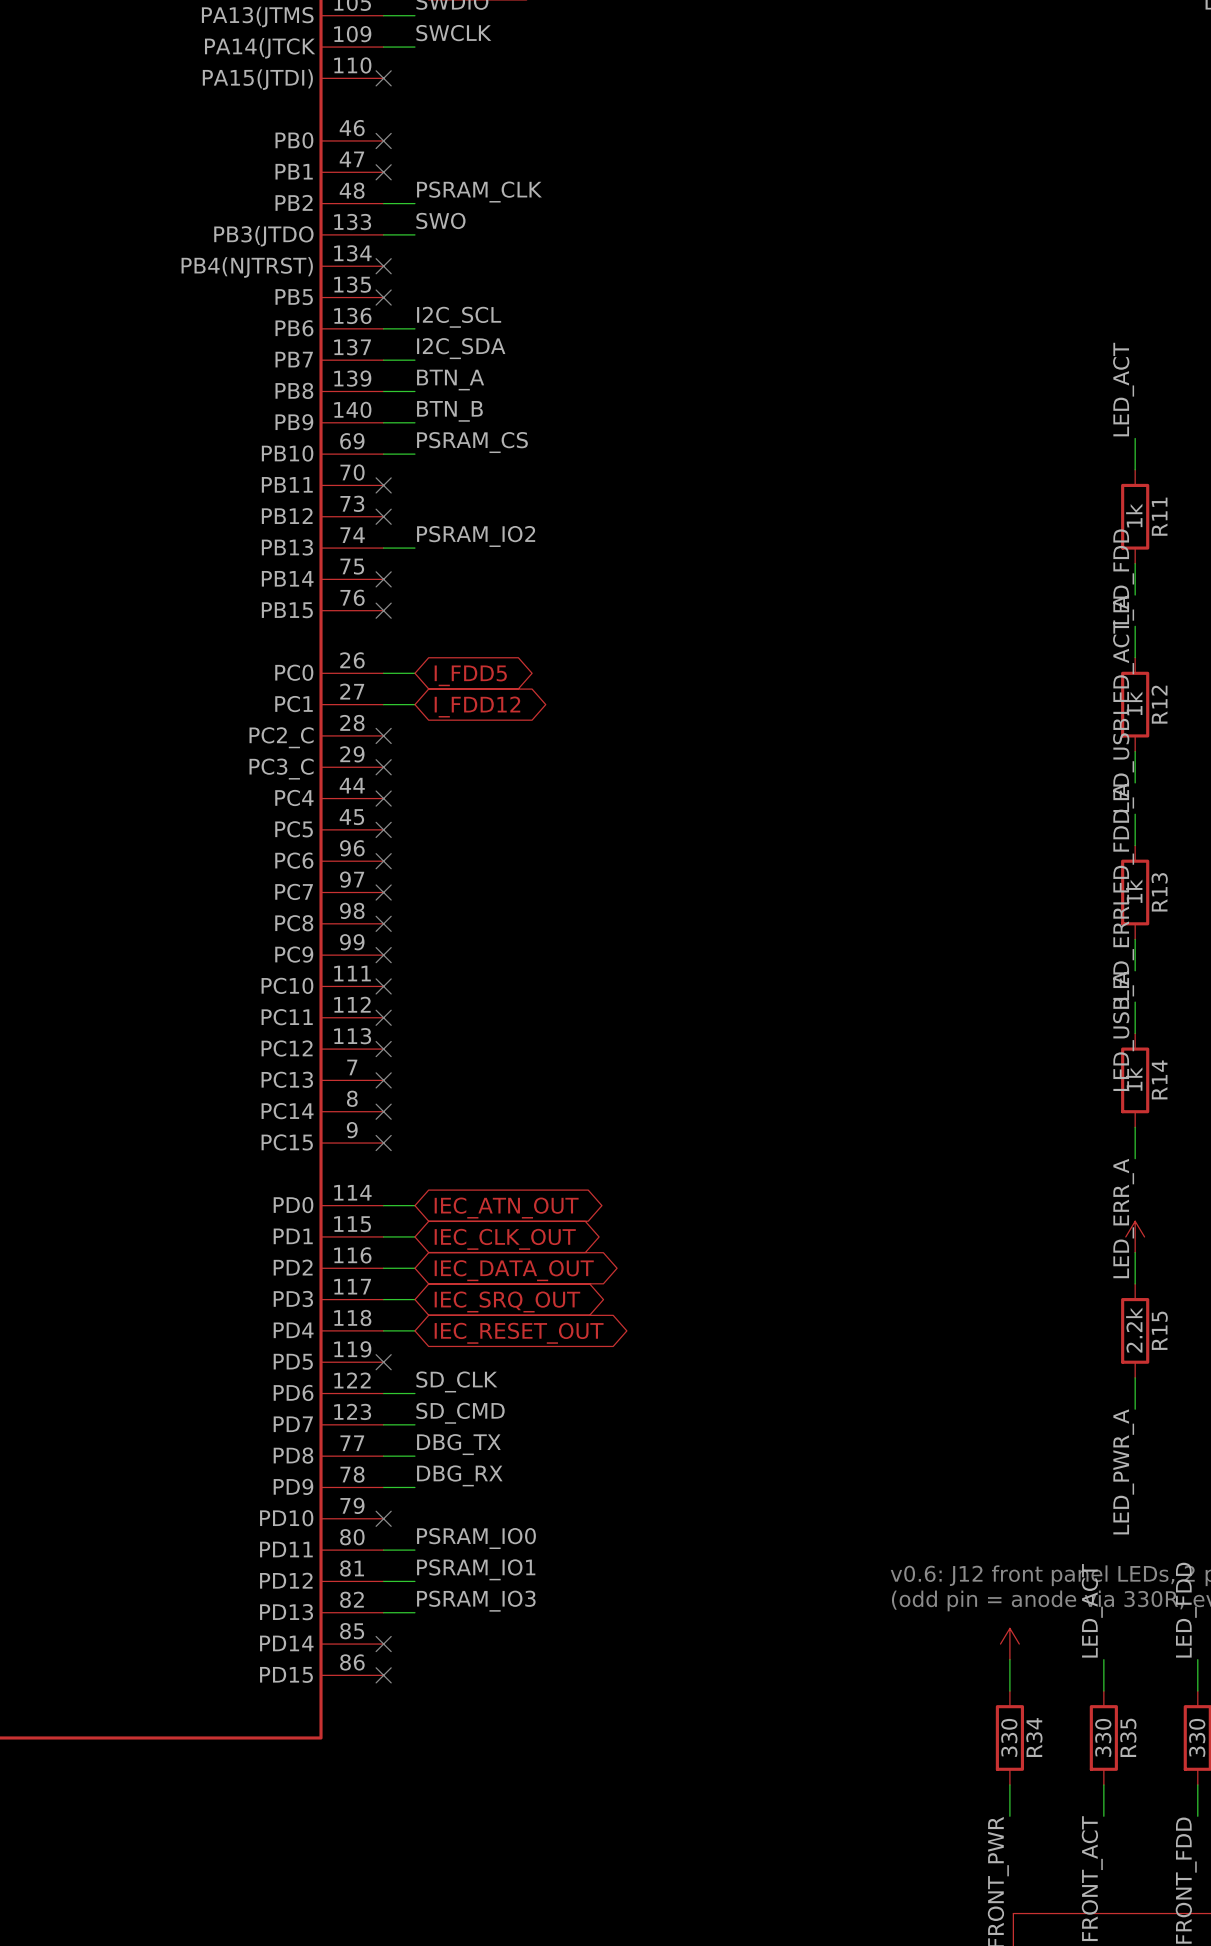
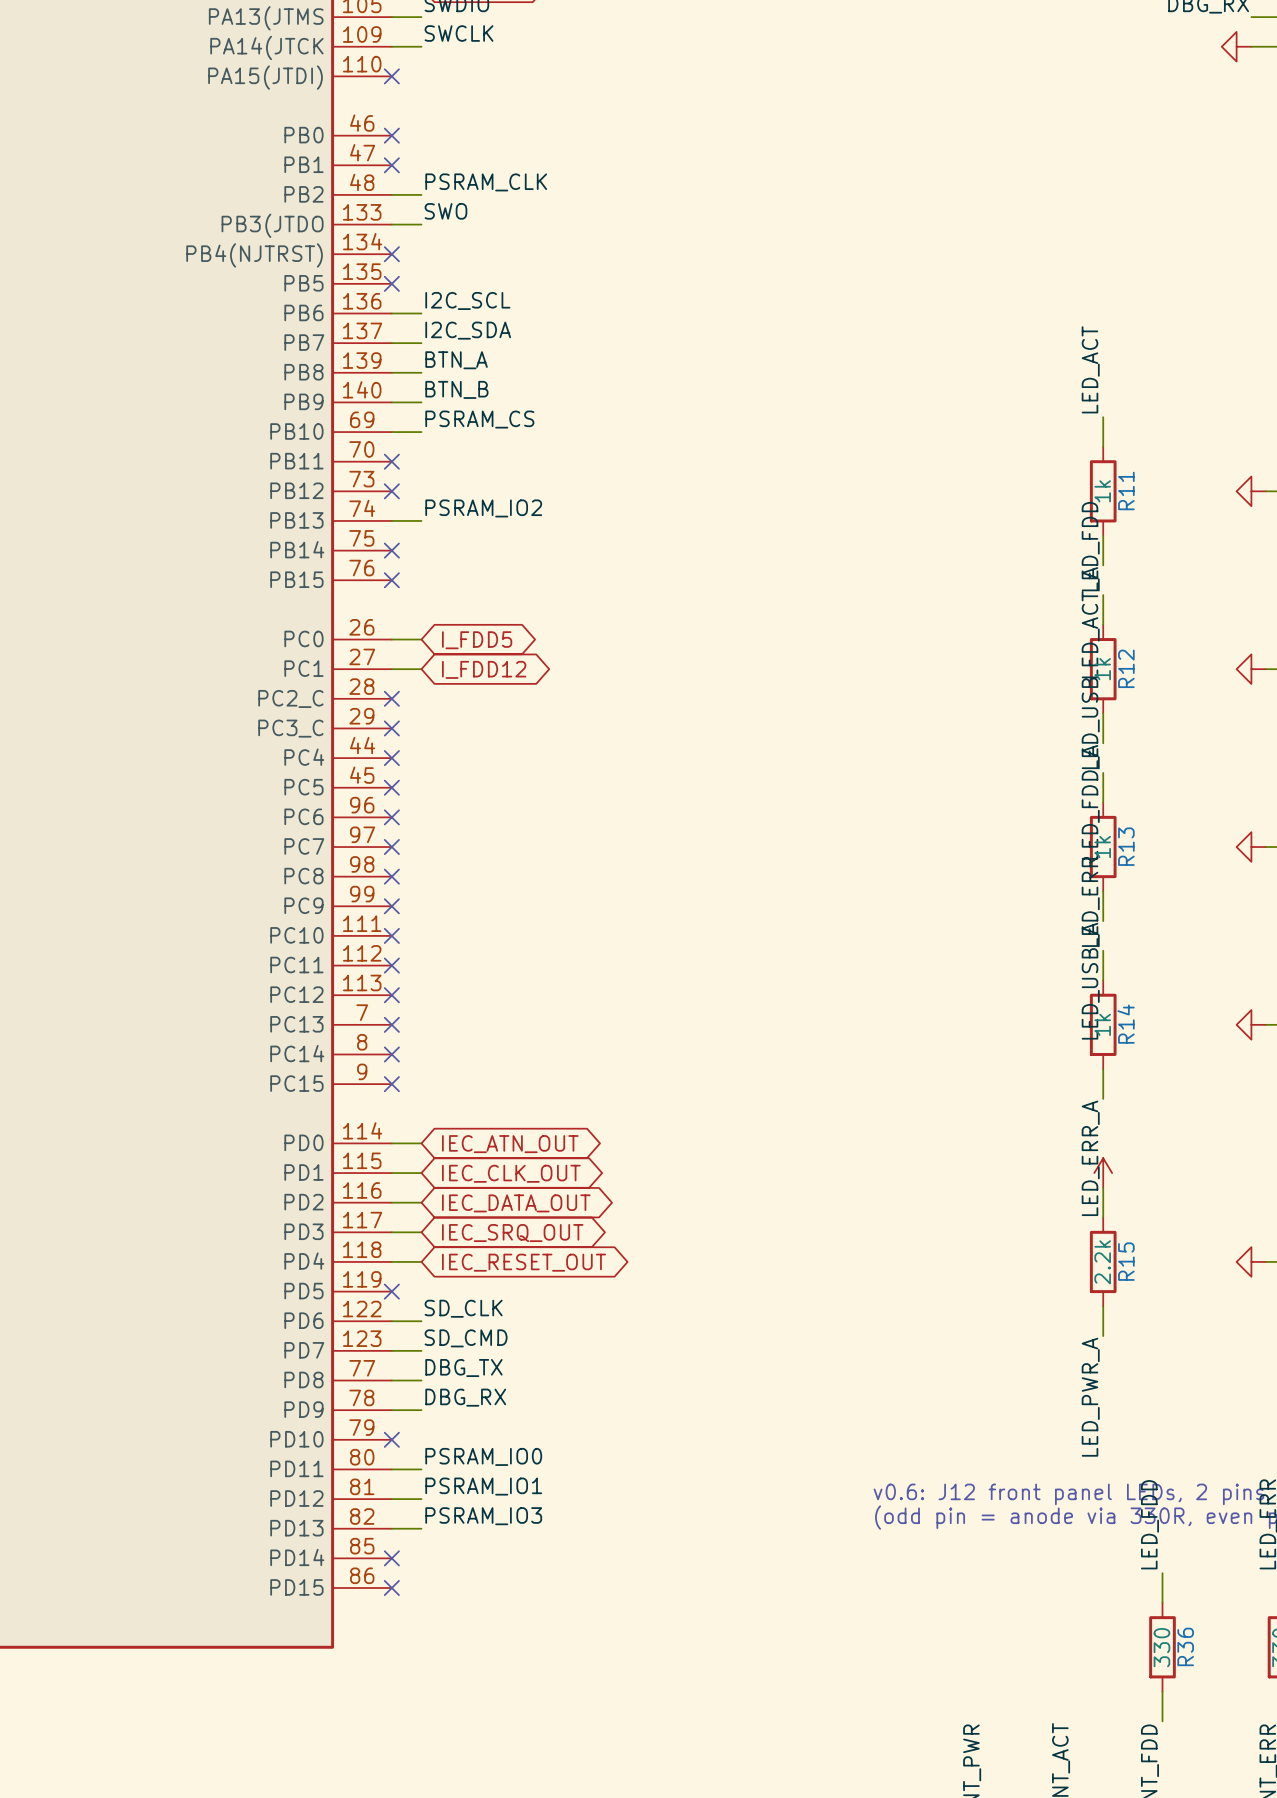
label: LED_ACT (1092, 1610) -> none
power symbol: (1009, 1644) -> none
wire: (1009, 1659) (1009, 1691) -> none
wire: (1103, 1659) (1103, 1691) -> none
R34: 330 (1009, 1737) -> none
R35: 330 (1103, 1737) -> none
wire: (1009, 1784) (1009, 1816) -> none
wire: (1103, 1784) (1103, 1816) -> none

